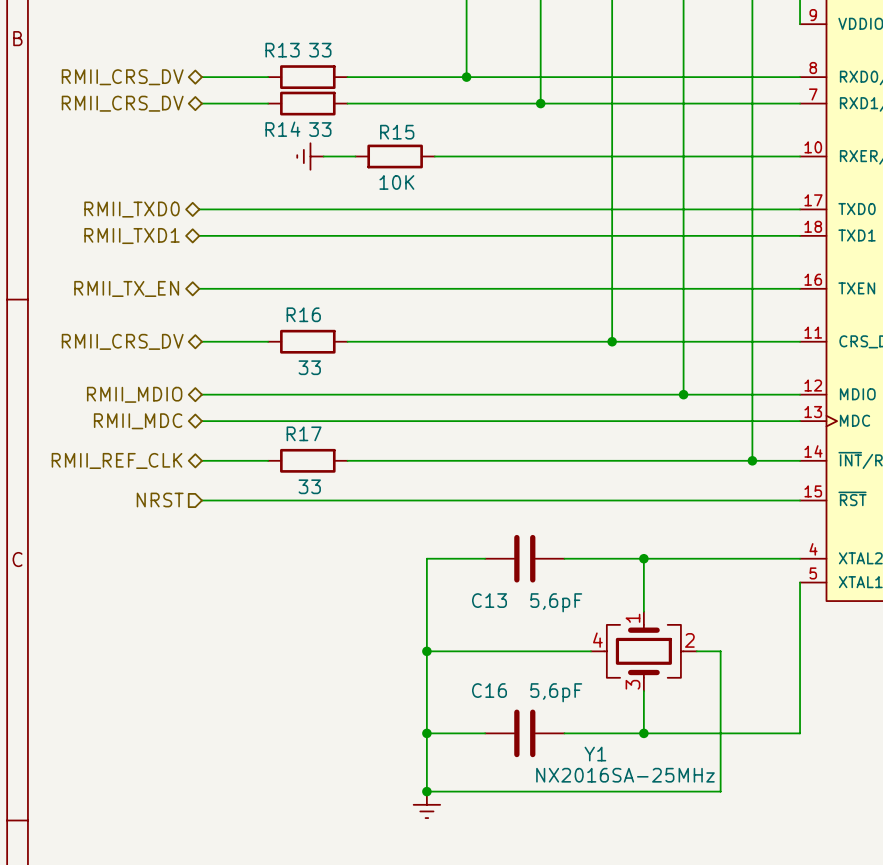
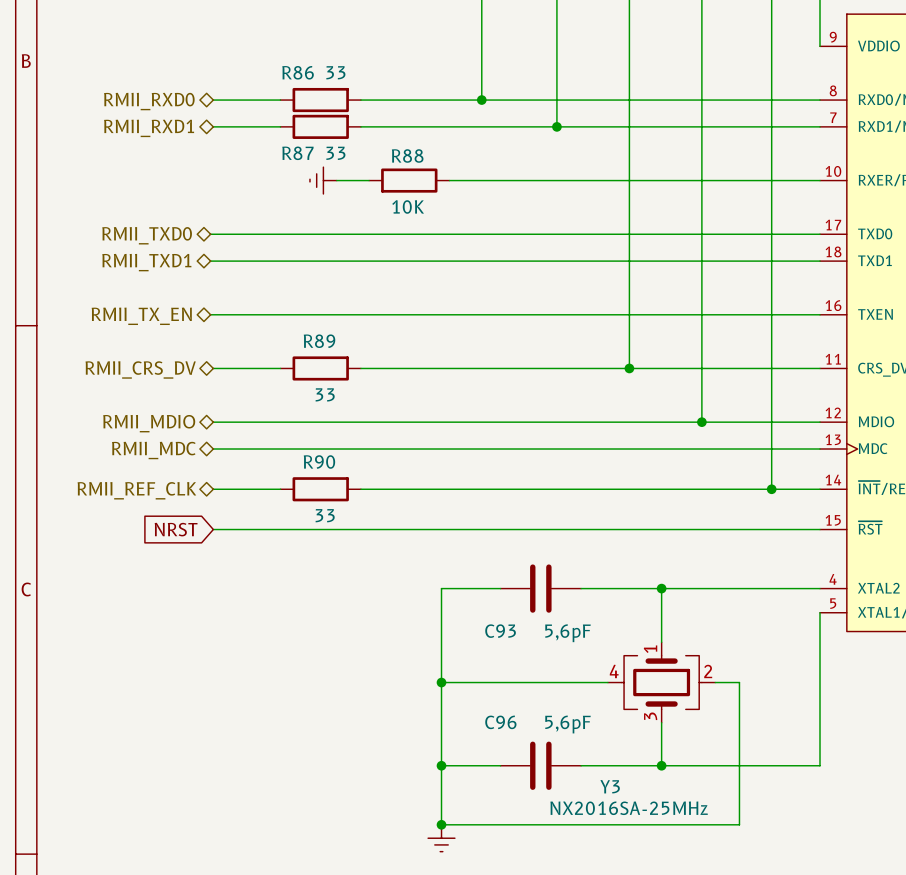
R13 name: R13 (282, 50) -> R86 (298, 72)
hierarchical label: RMII_CRS_DV (122, 77) -> RMII_RXD0 (149, 101)
hierarchical label: RMII_CRS_DV (122, 103) -> RMII_RXD1 (149, 128)
R14 name: R14 (282, 129) -> R87 (297, 153)
R15 name: R15 (397, 132) -> R88 (407, 155)
R16 name: R16 (303, 314) -> R89 (319, 341)
R17 name: R17 (304, 433) -> R90 (319, 462)
hierarchical label: NRST (160, 500) -> none
global label: none -> NRST (176, 529)
C13 name: C13 (489, 600) -> C93 (500, 631)
C16 name: C16 (489, 690) -> C96 (500, 722)
Y1 name: Y1 (595, 754) -> Y3 (610, 786)

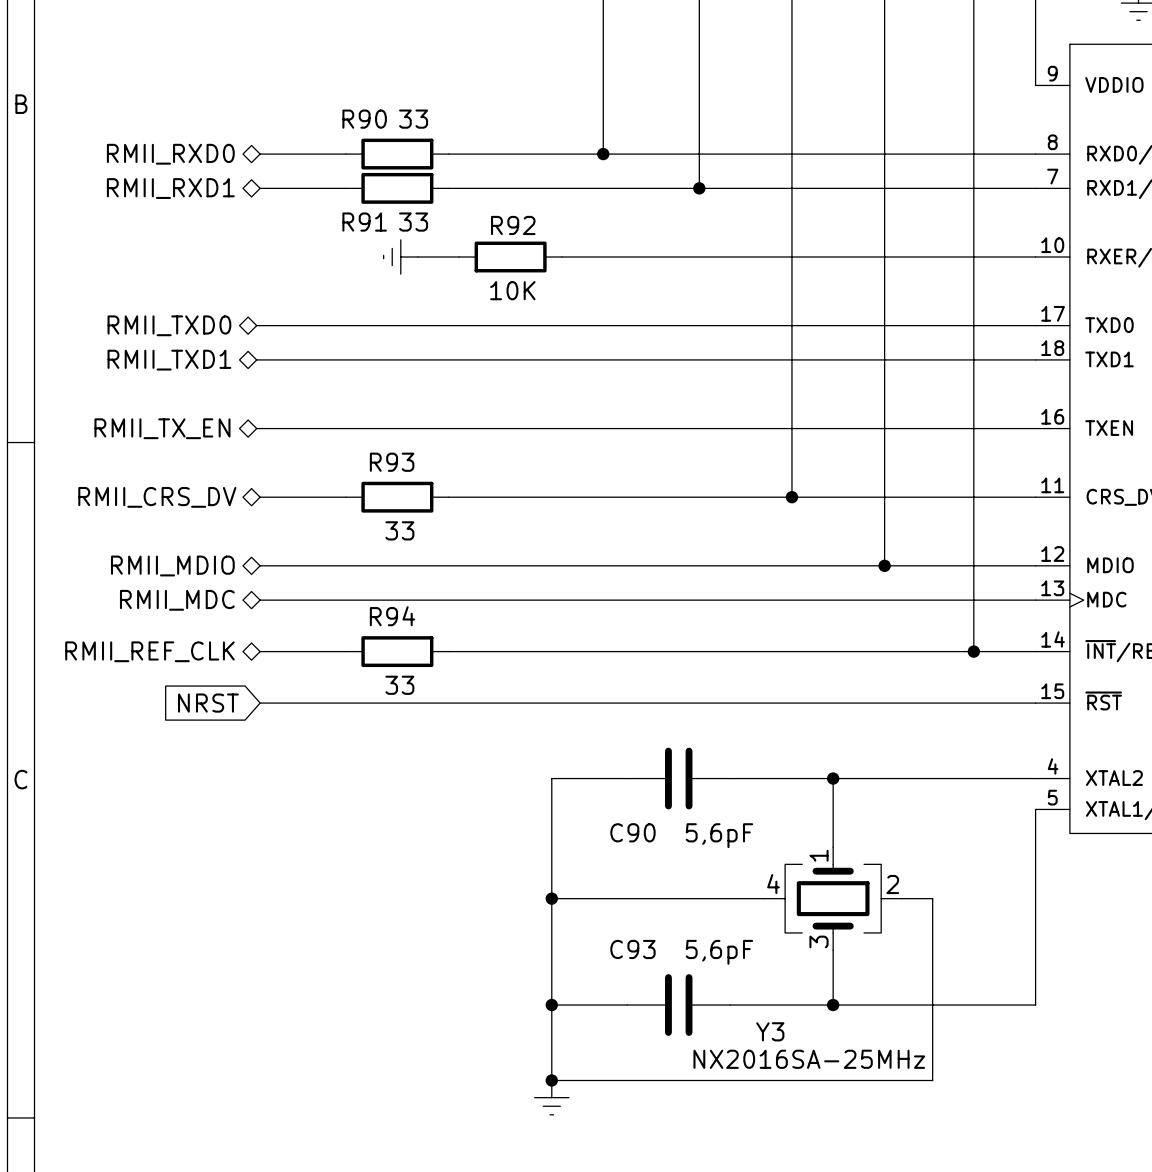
R86 name: R86 (298, 72) -> R90 (364, 119)
R87 name: R87 (297, 153) -> R91 (364, 222)
R88 name: R88 (407, 155) -> R92 (513, 225)
R89 name: R89 (319, 341) -> R93 (392, 462)
R90 name: R90 (319, 462) -> R94 (392, 616)
C93 name: C93 (500, 631) -> C90 (632, 832)
C96 name: C96 (500, 722) -> C93 (632, 949)

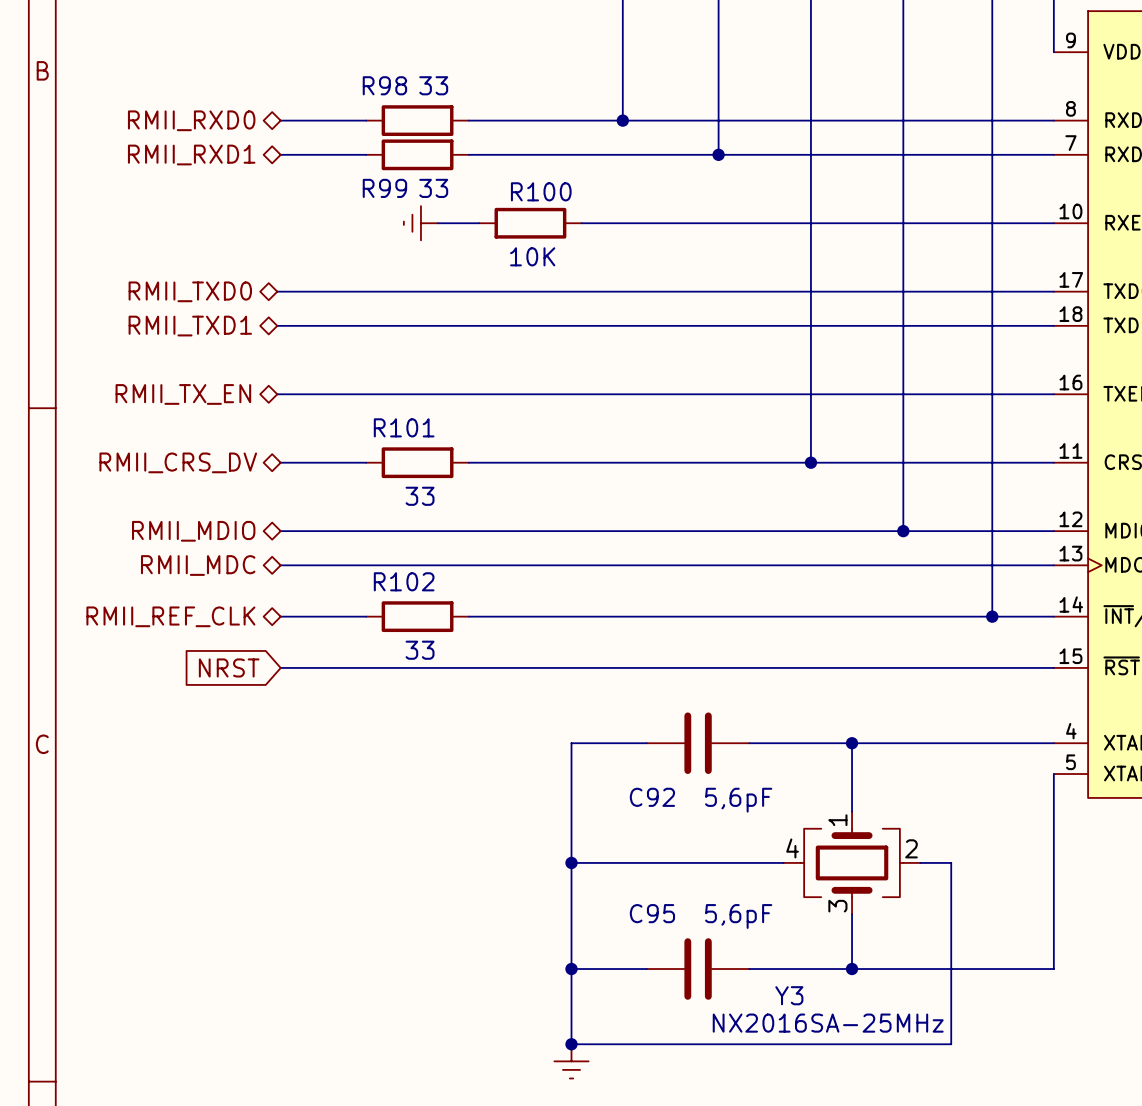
R90 name: R90 (364, 119) -> R98 (384, 85)
R91 name: R91 (364, 222) -> R99 (384, 188)
R92 name: R92 (513, 225) -> R100 (541, 191)
R93 name: R93 (392, 462) -> R101 (404, 427)
R94 name: R94 (392, 616) -> R102 (404, 581)
C90 name: C90 (632, 832) -> C92 (652, 797)
C93 name: C93 (632, 949) -> C95 (652, 913)

